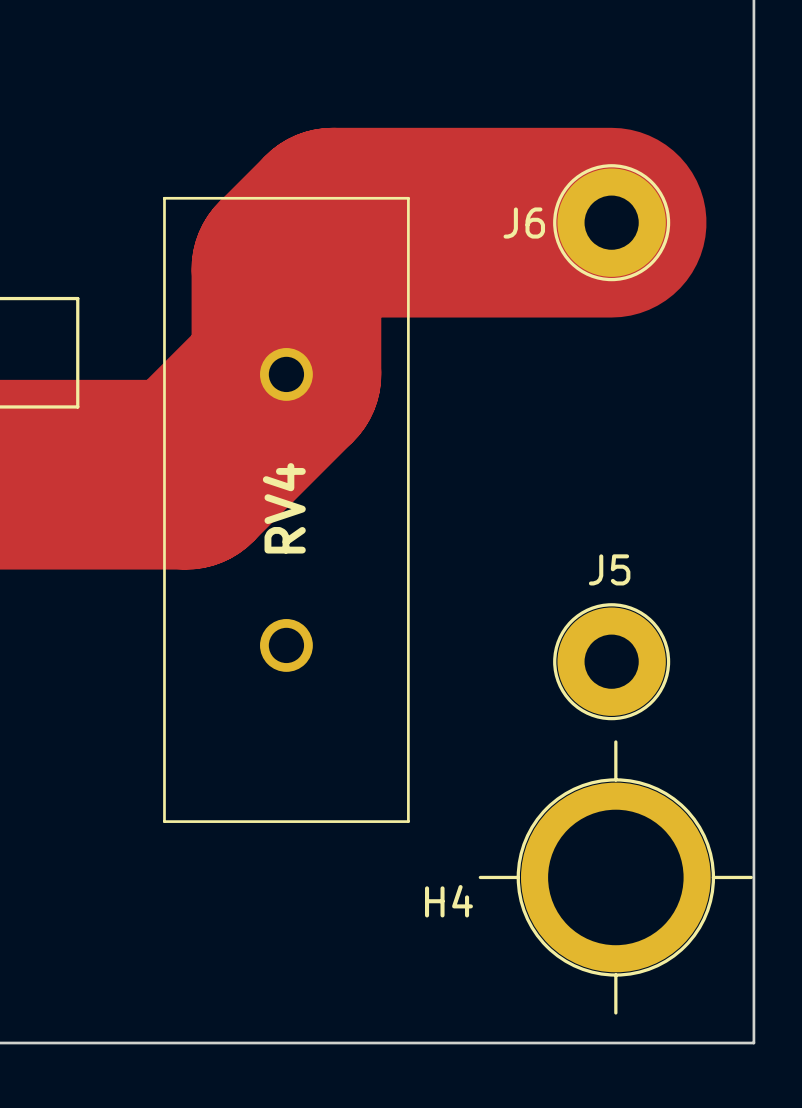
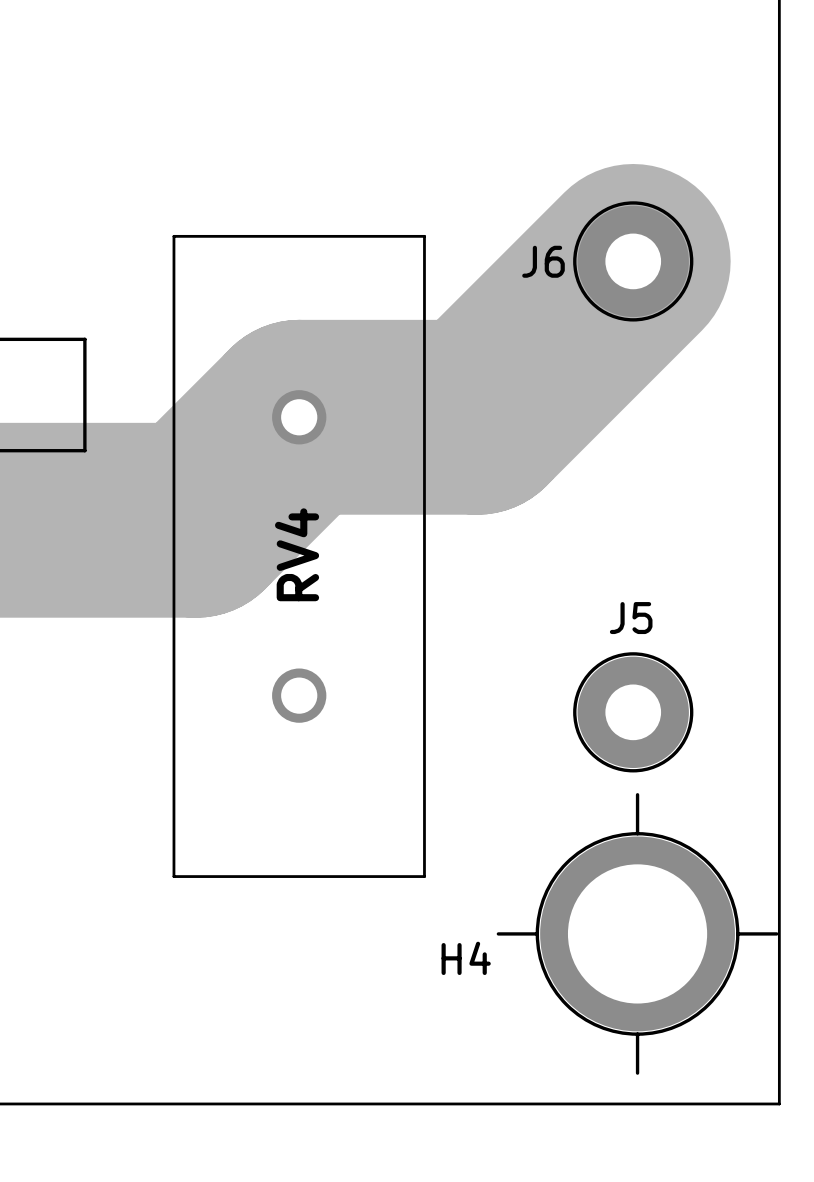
track: (611, 222) (332, 222) (286, 268) (286, 374) -> (633, 261) (477, 417) (299, 417)

